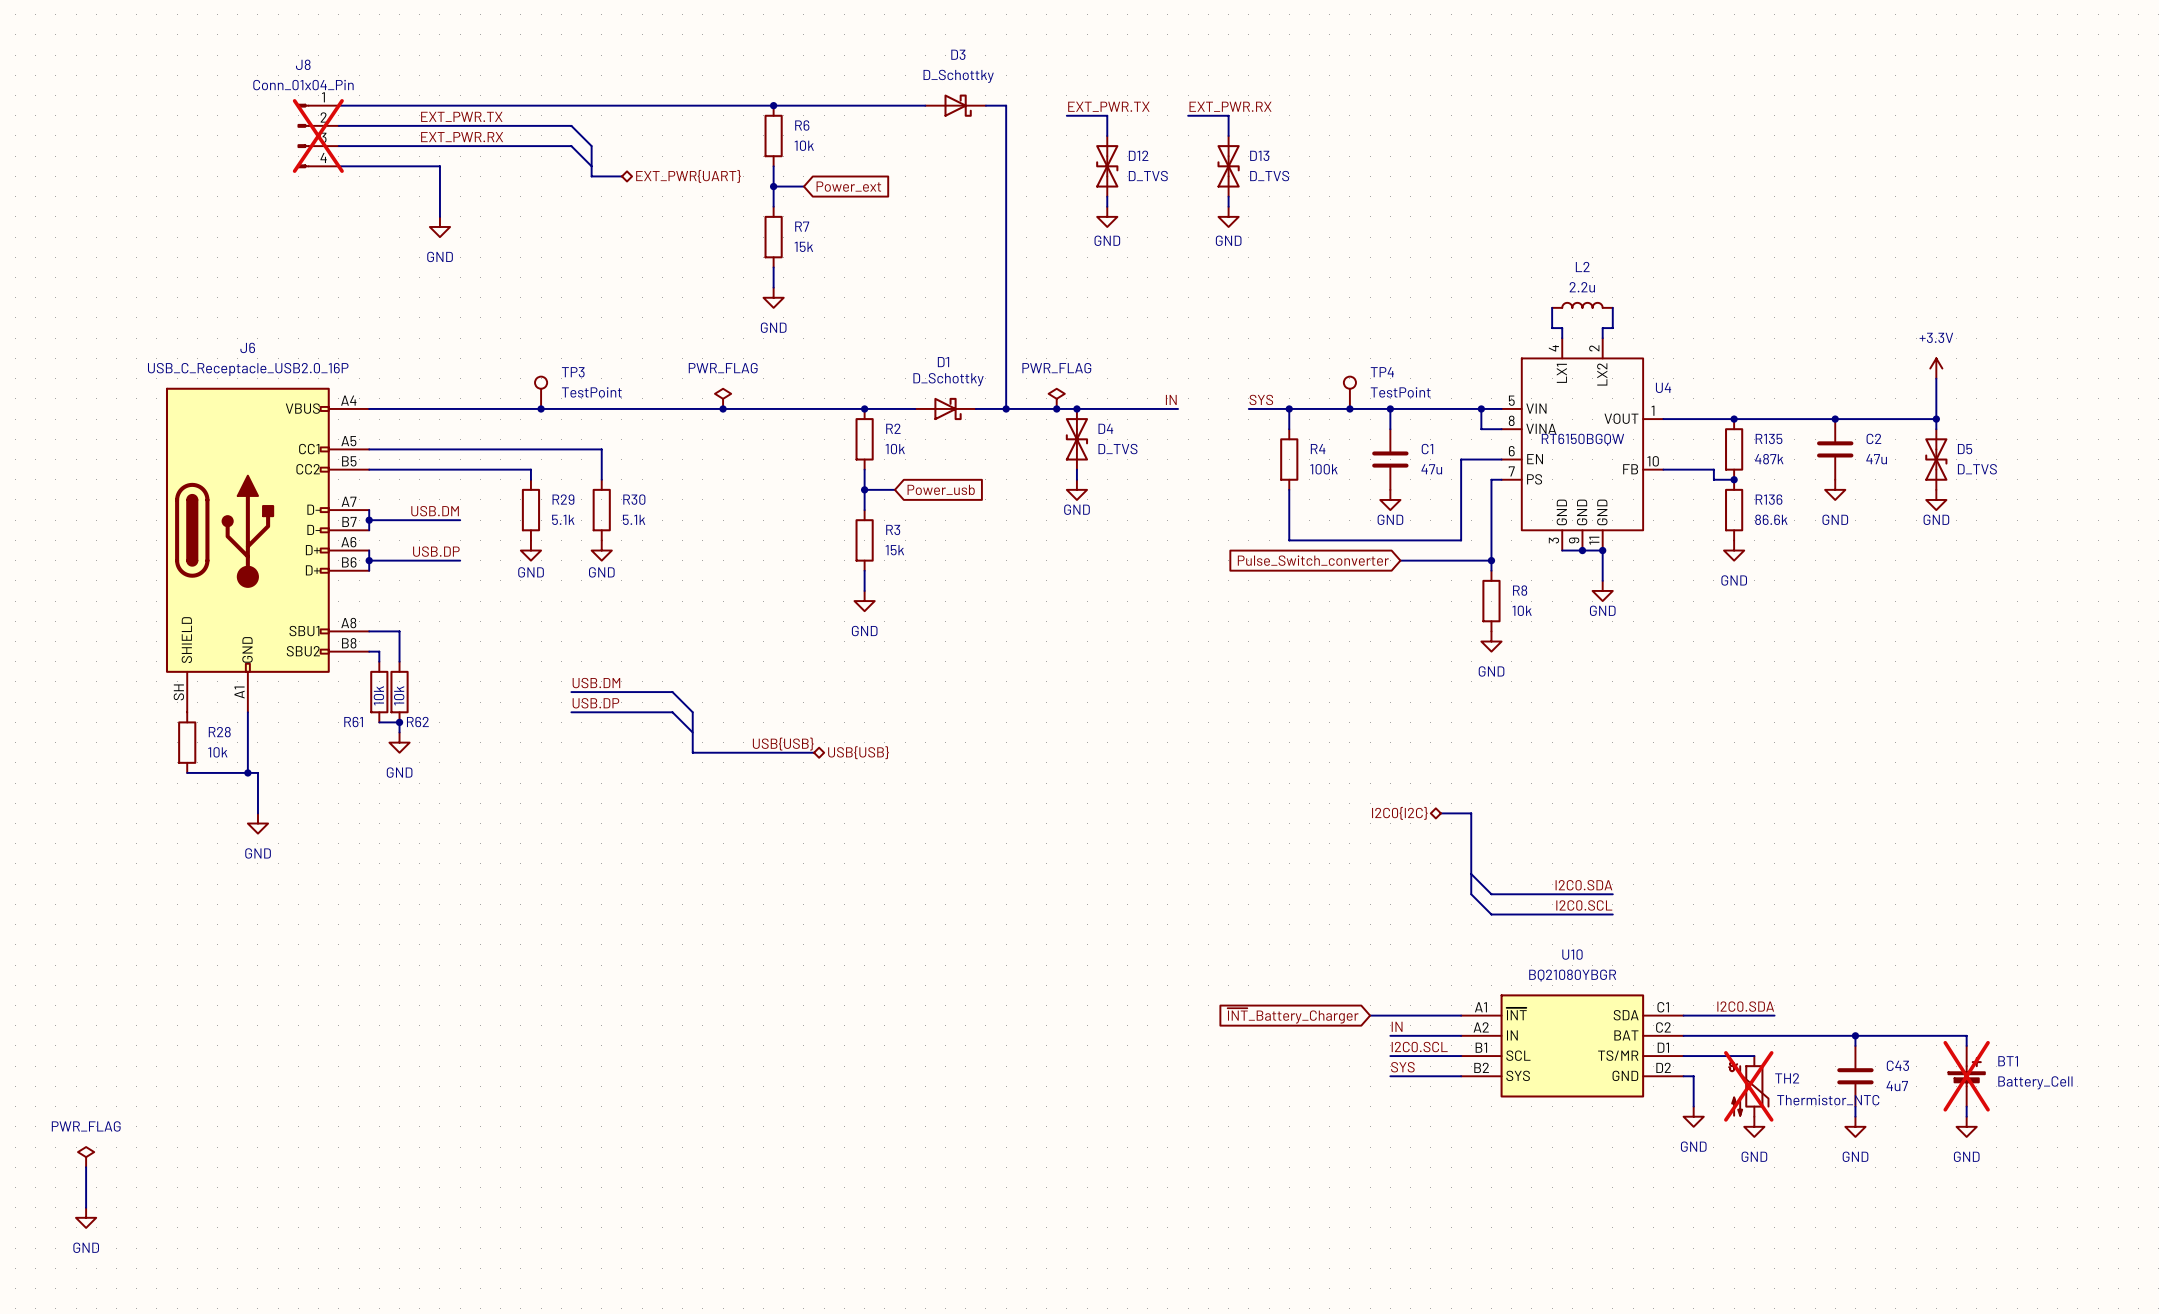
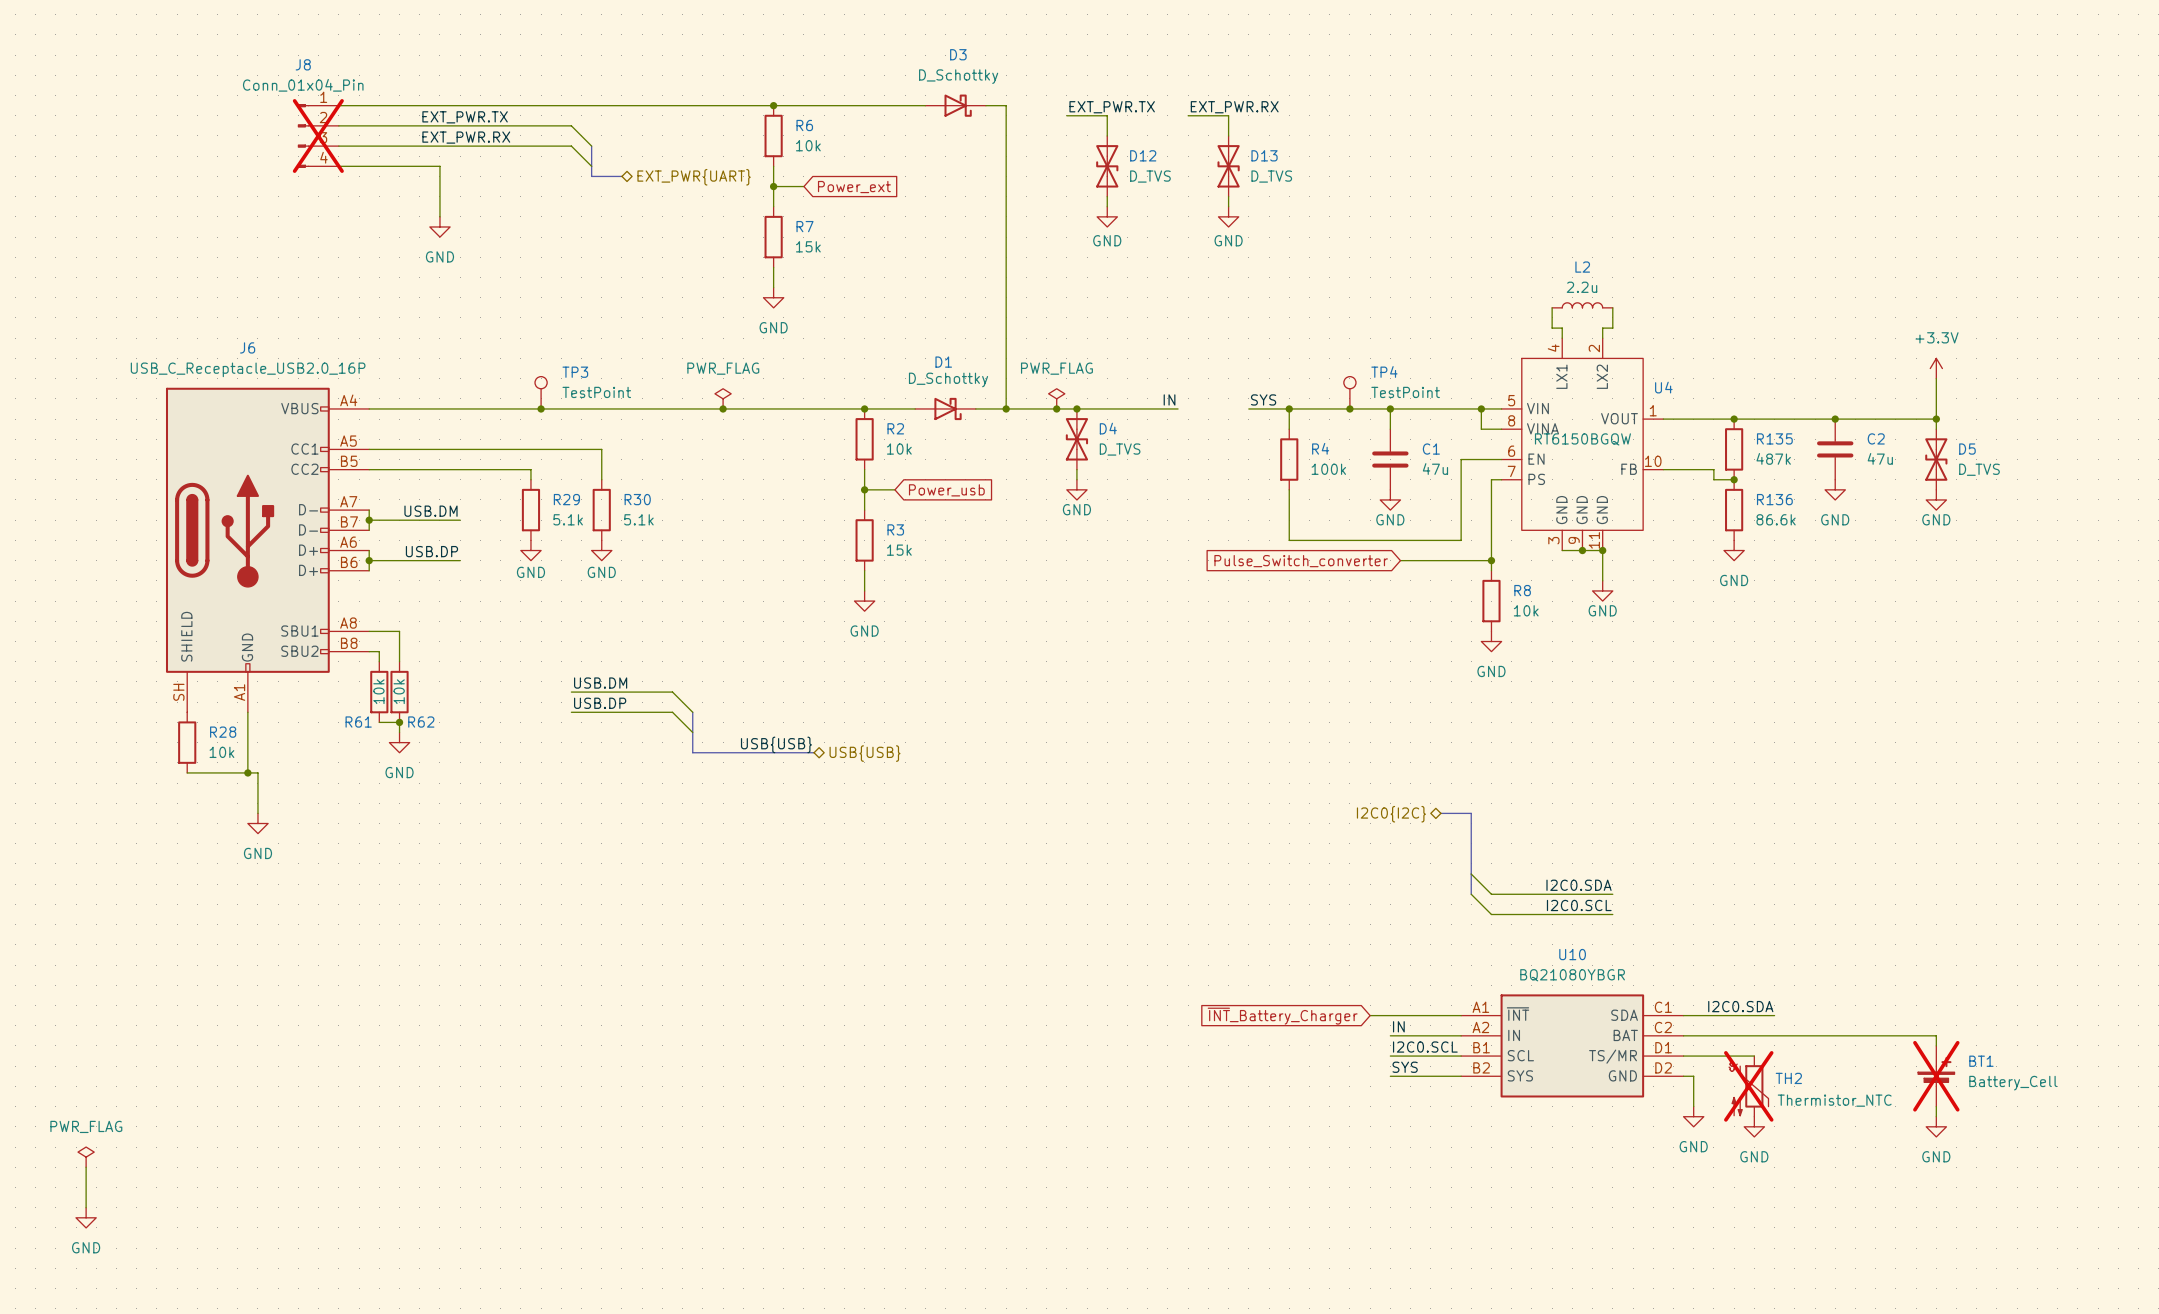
wire: (1855, 1035) (1855, 1045) -> none
junction: (1855, 1035) -> none
wire: (1936, 1035) (1966, 1035) (1966, 1045) -> (1936, 1035) (1936, 1045)
C43: 4u7 (1855, 1076) -> none
BT1 position: (1966, 1076) -> (1936, 1076)
wire: (1855, 1106) (1855, 1116) -> none
wire: (1966, 1106) (1966, 1116) -> (1936, 1106) (1936, 1116)
power symbol: GND (1855, 1126) -> none
power symbol position: GND (1966, 1126) -> GND (1936, 1126)

